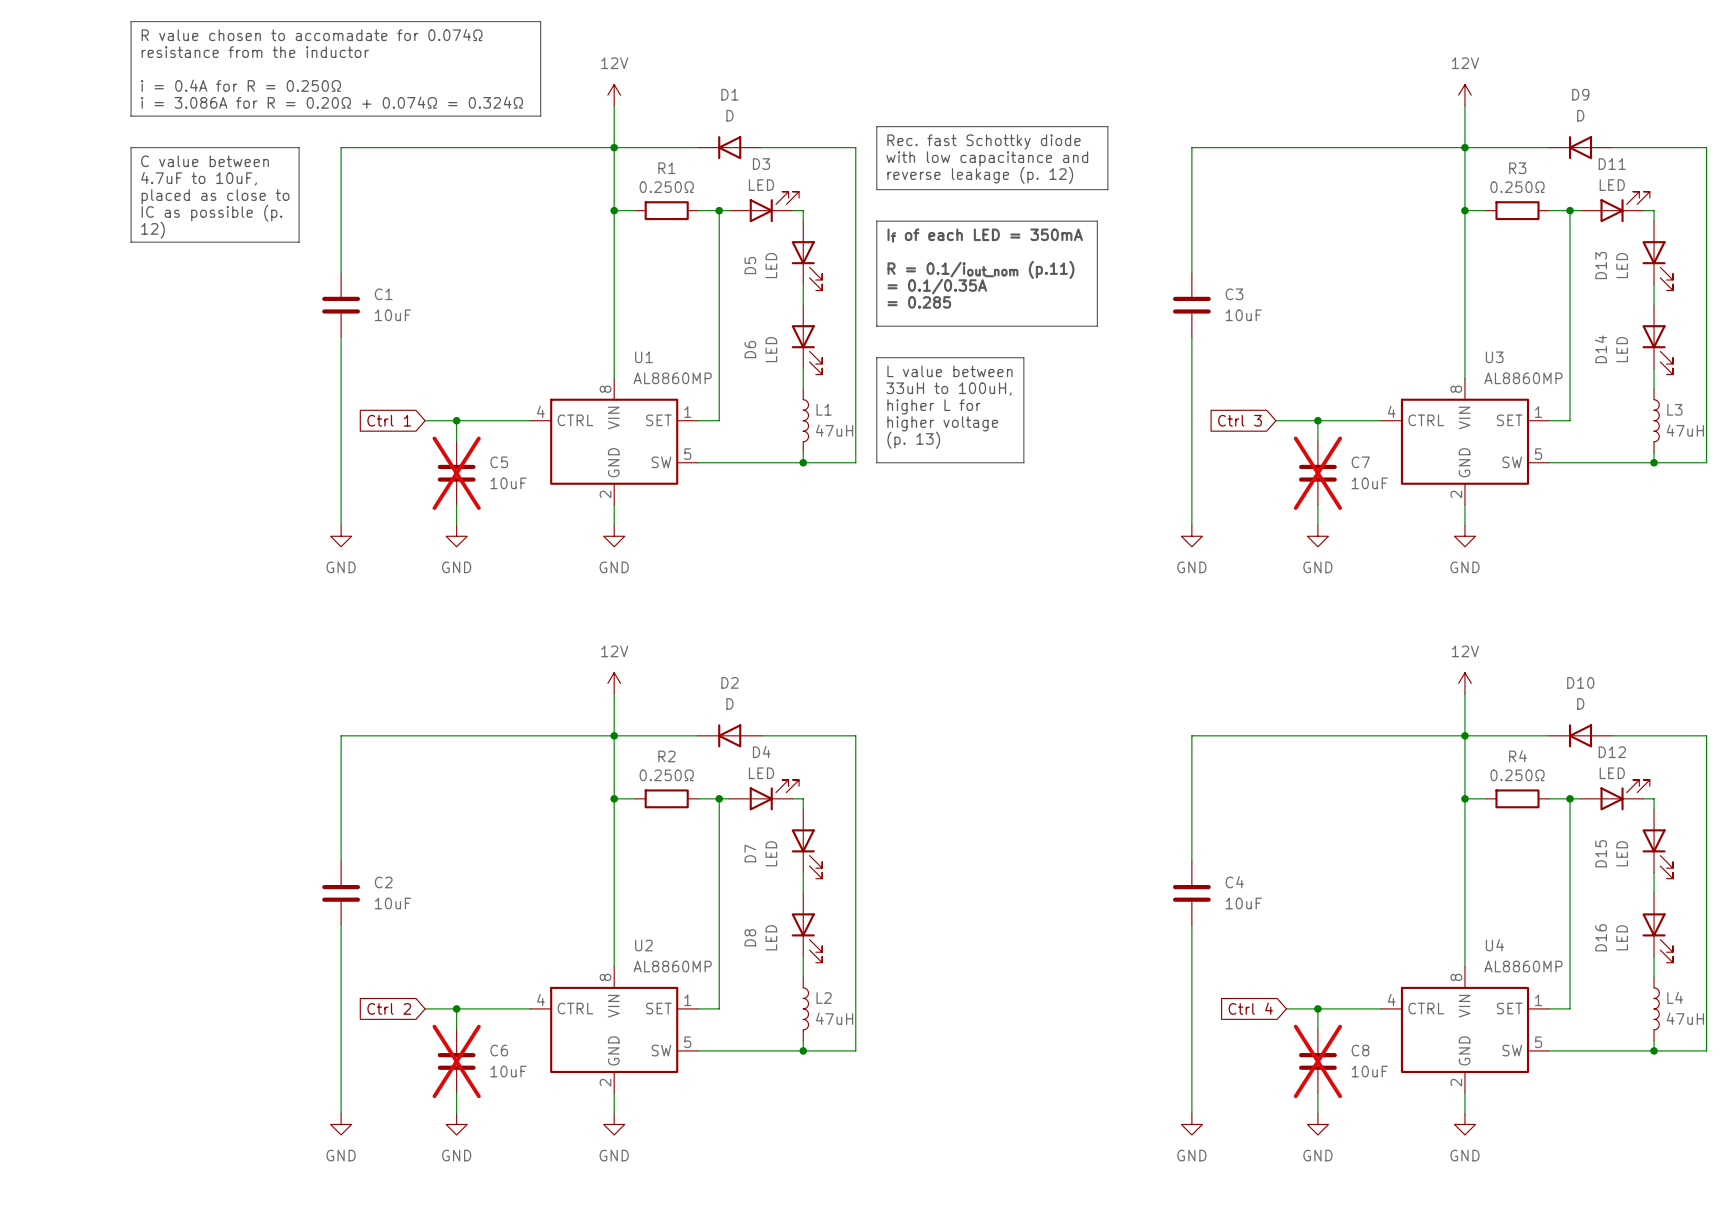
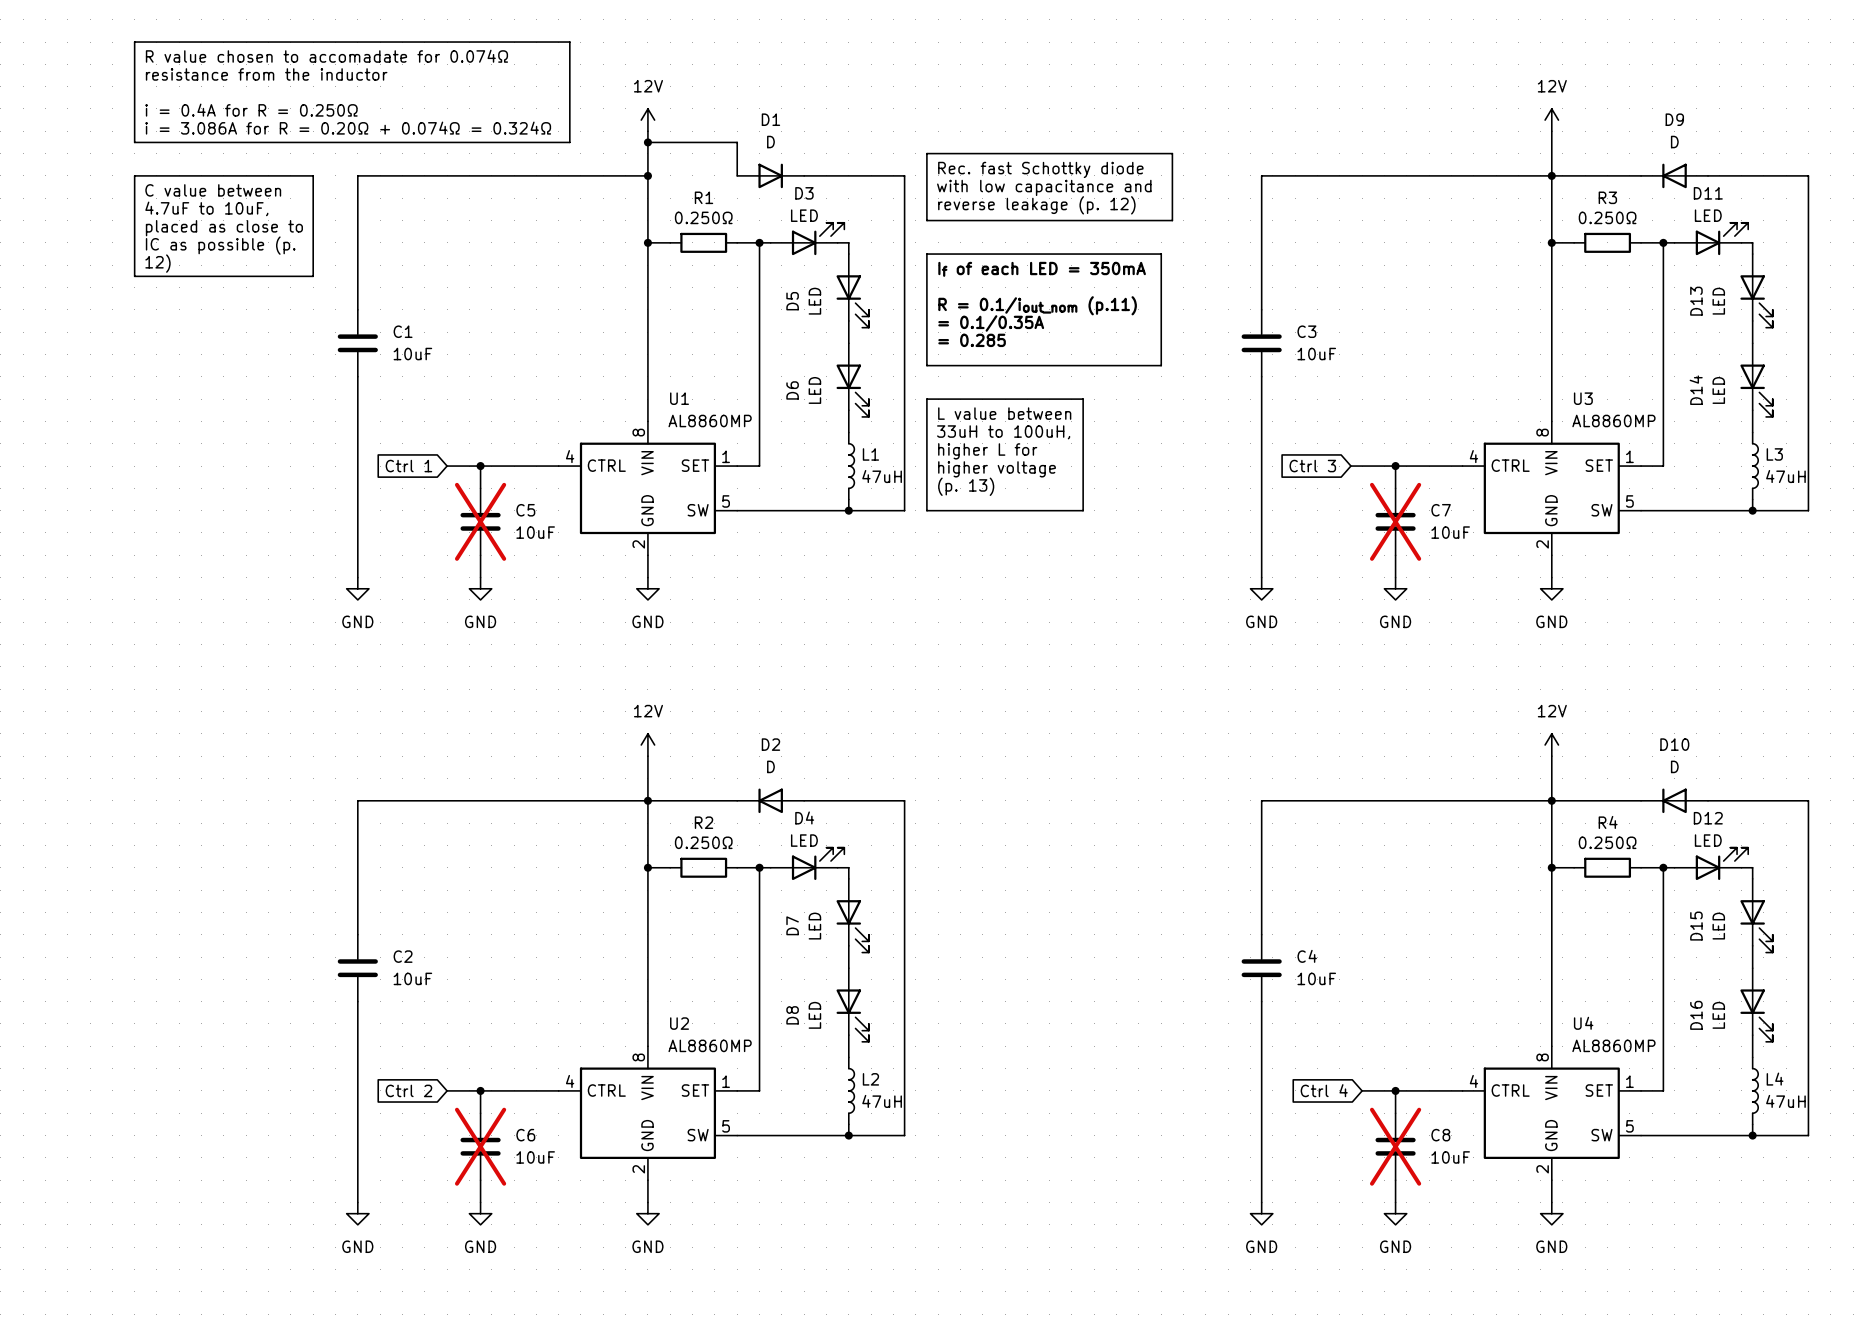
junction: none -> (647, 142)
wire: (614, 147) (698, 147) -> (647, 142) (737, 142) (737, 175)
D1 rotation: 0° (729, 147) -> 180° (770, 175)

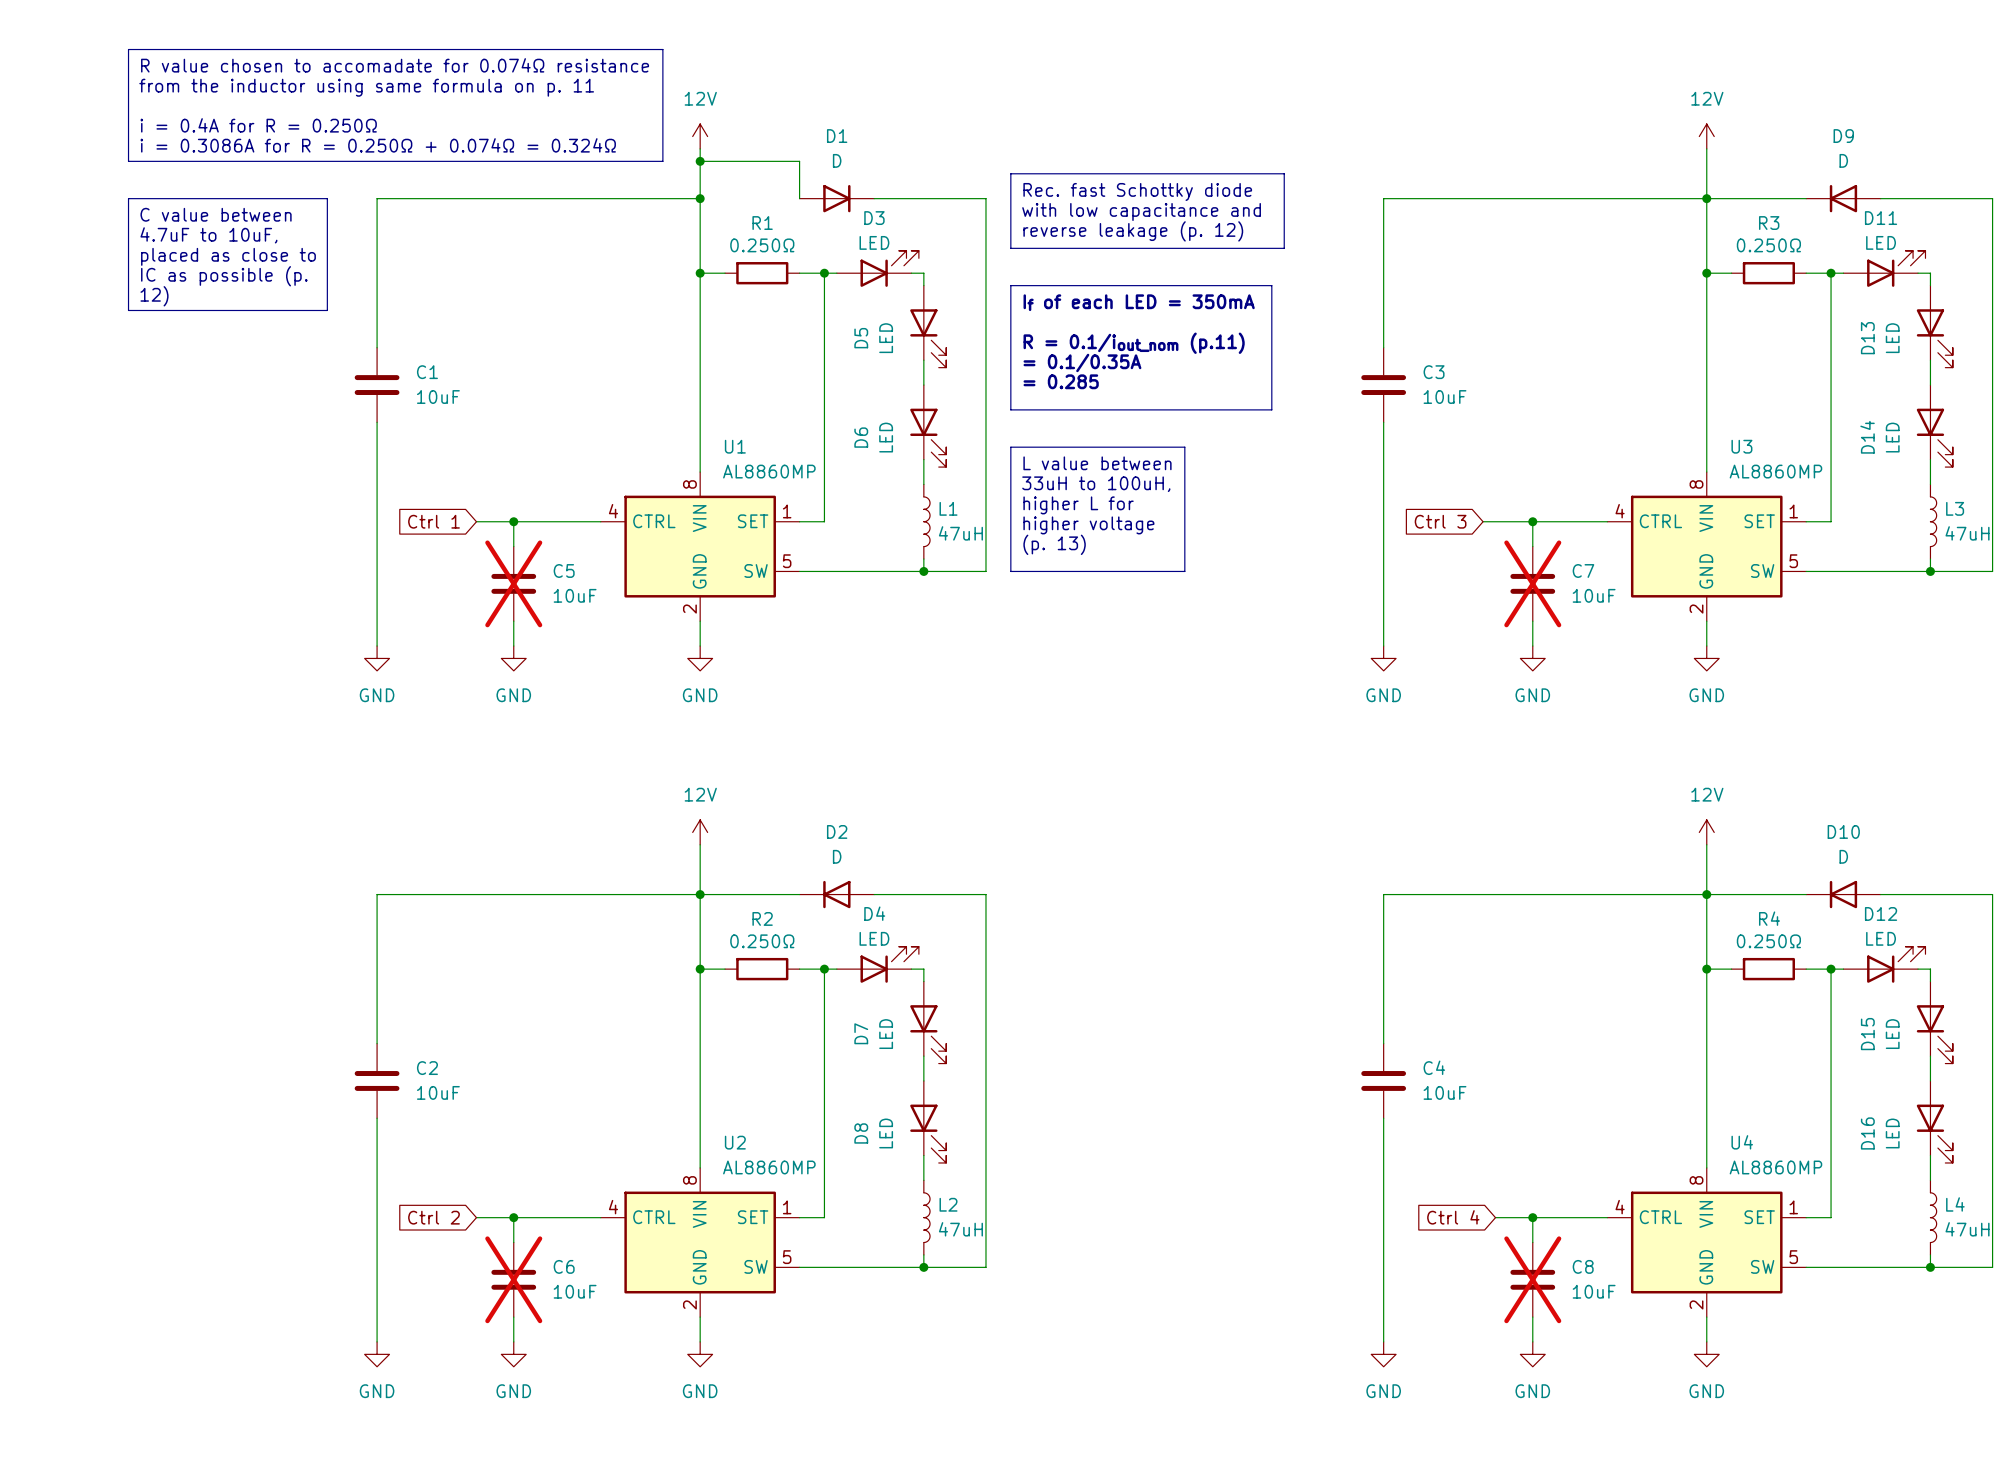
line: (569, 42) (569, 142) -> (613, 49) (662, 49) (662, 161) (613, 161)
text: R value chosen to accomadate for 0.074Ω (326, 56) -> R value chosen to accomadate for 0.074Ω resistance (395, 65)
text: resistance from the inductor (266, 74) -> from the inductor using same formula on p. 11 (366, 87)
text: i = 3.086A for R = 0.20Ω + 0.074Ω = 0.324Ω (348, 128) -> i = 0.3086A for R = 0.250Ω + 0.074Ω = 0.324Ω (378, 145)

